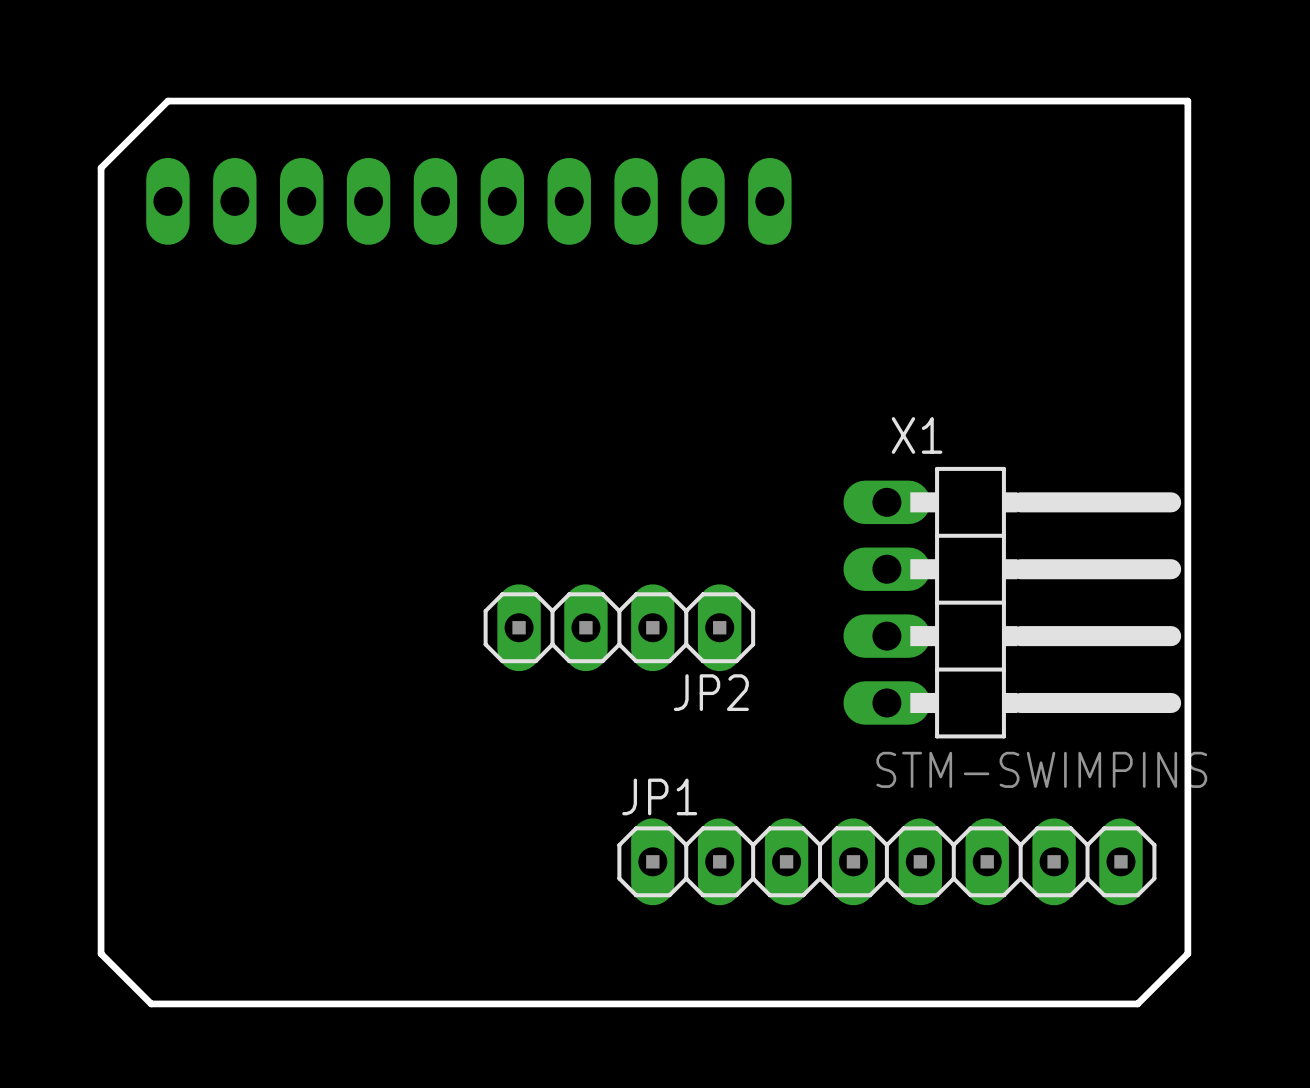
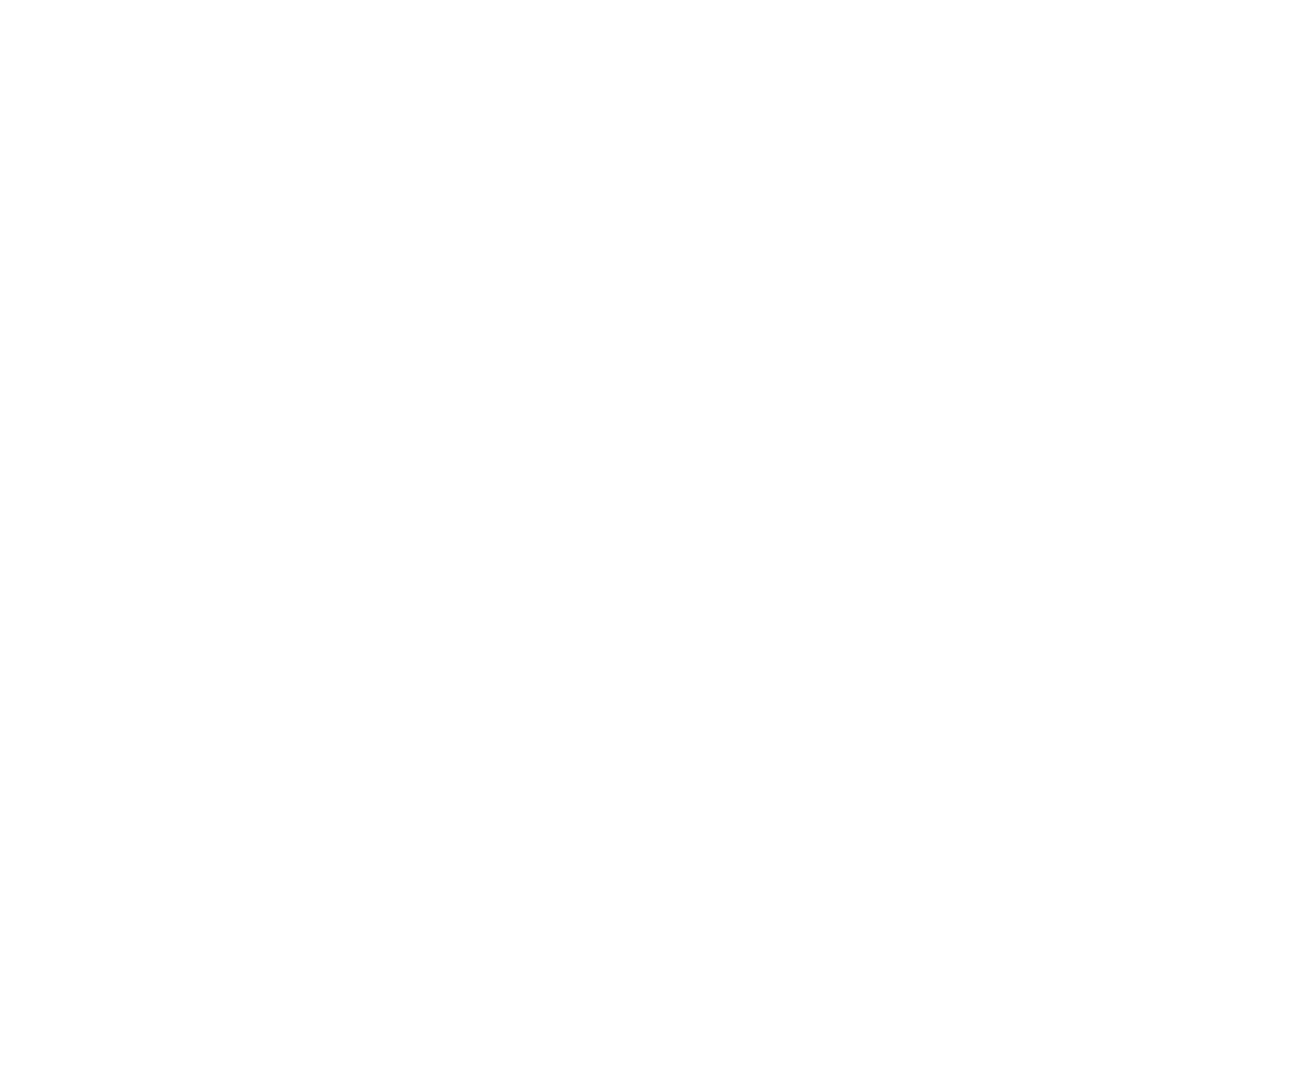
board edge: (167, 101) (1187, 101) (1187, 953) (1137, 1003) (151, 1003) (101, 953) (101, 167) (167, 101) -> none
part: (468, 201) -> none
X1: STM-SWIMPINS (1012, 602) -> none
JP2: (619, 627) -> none
JP1: (886, 861) -> none

